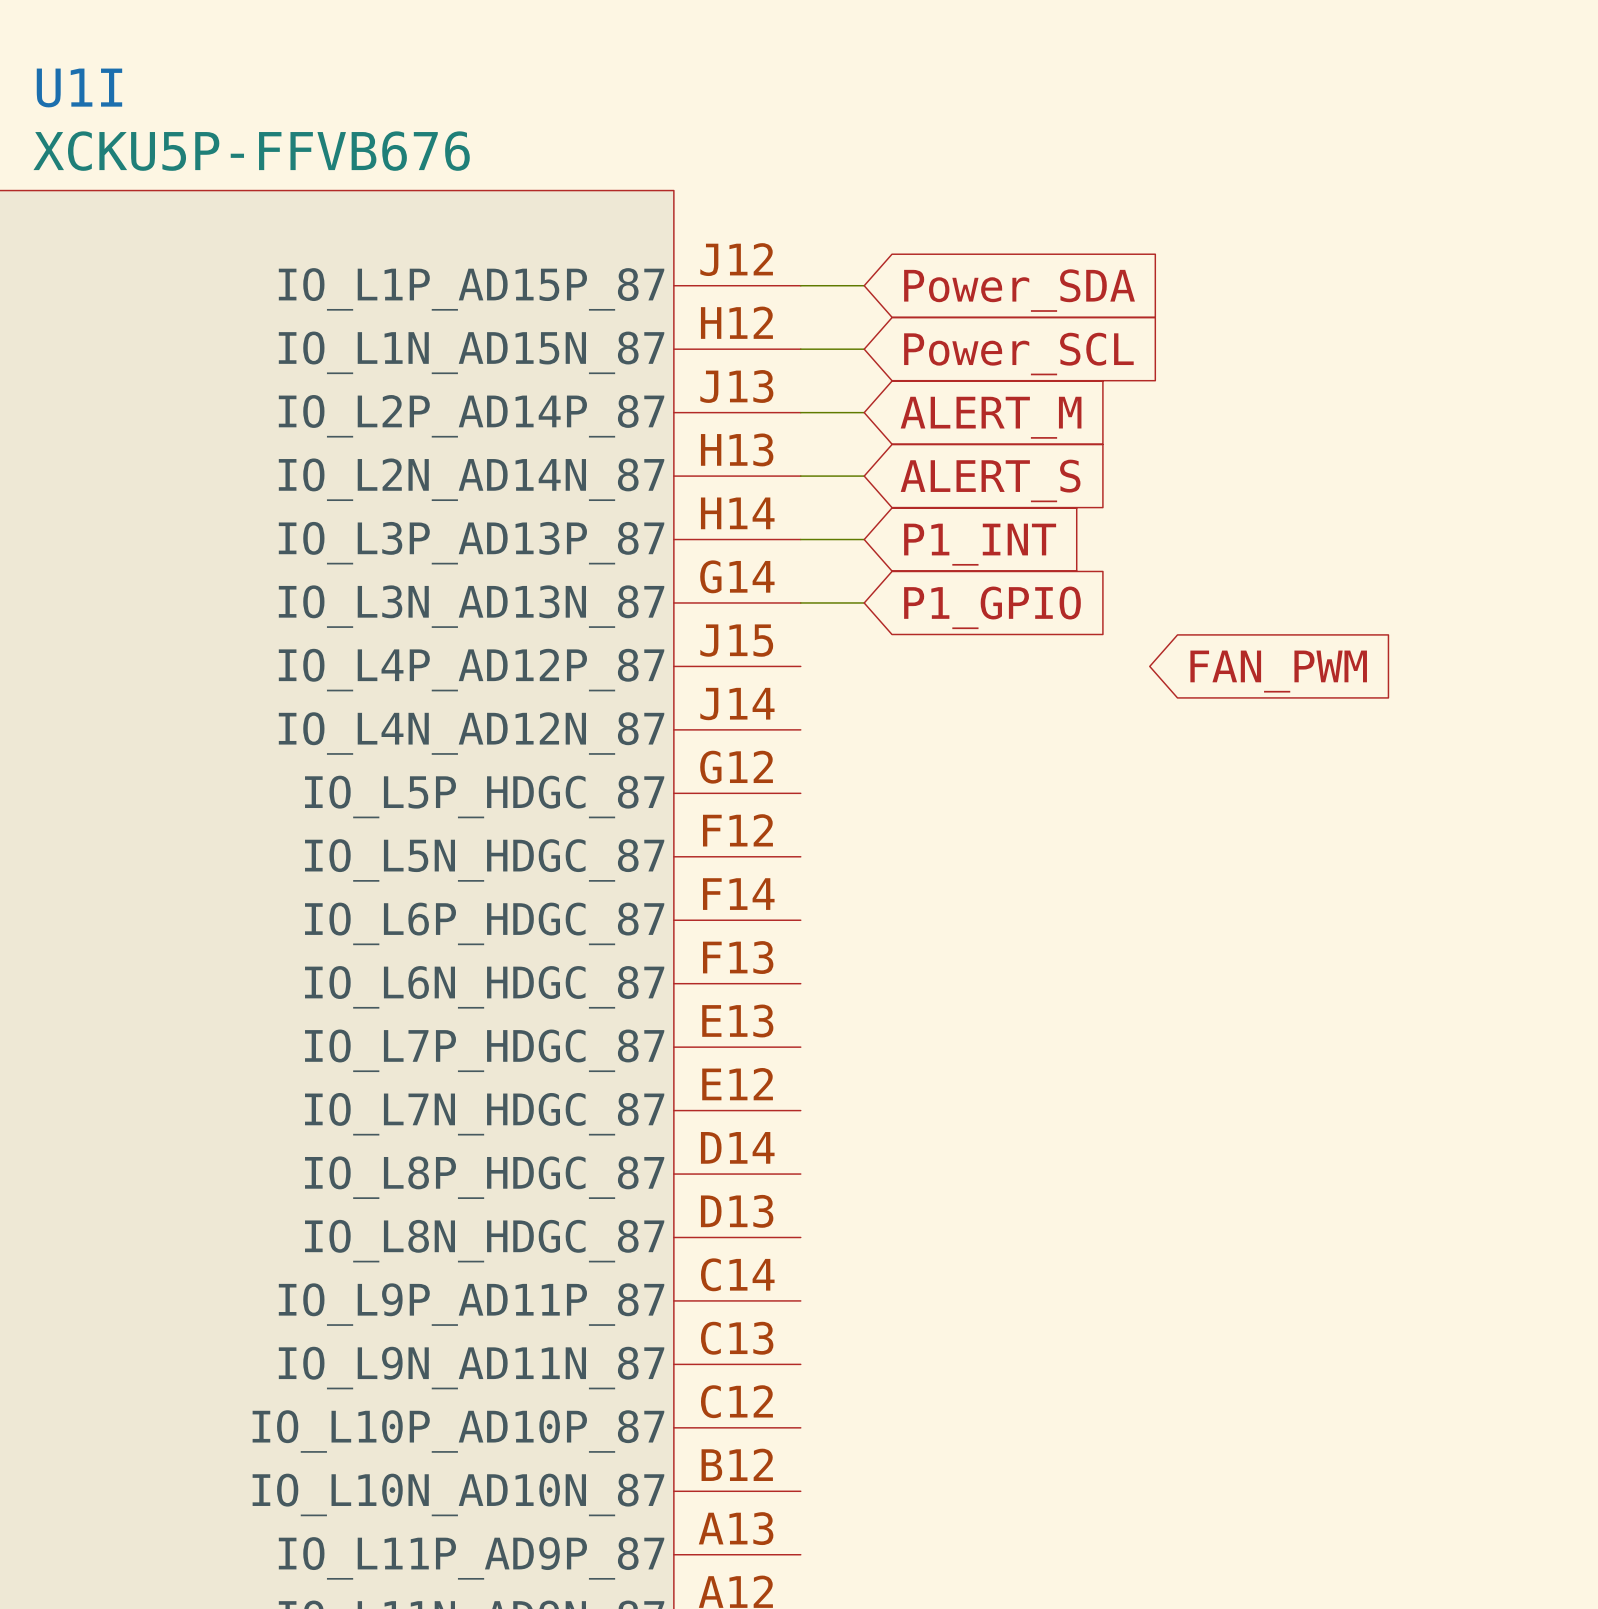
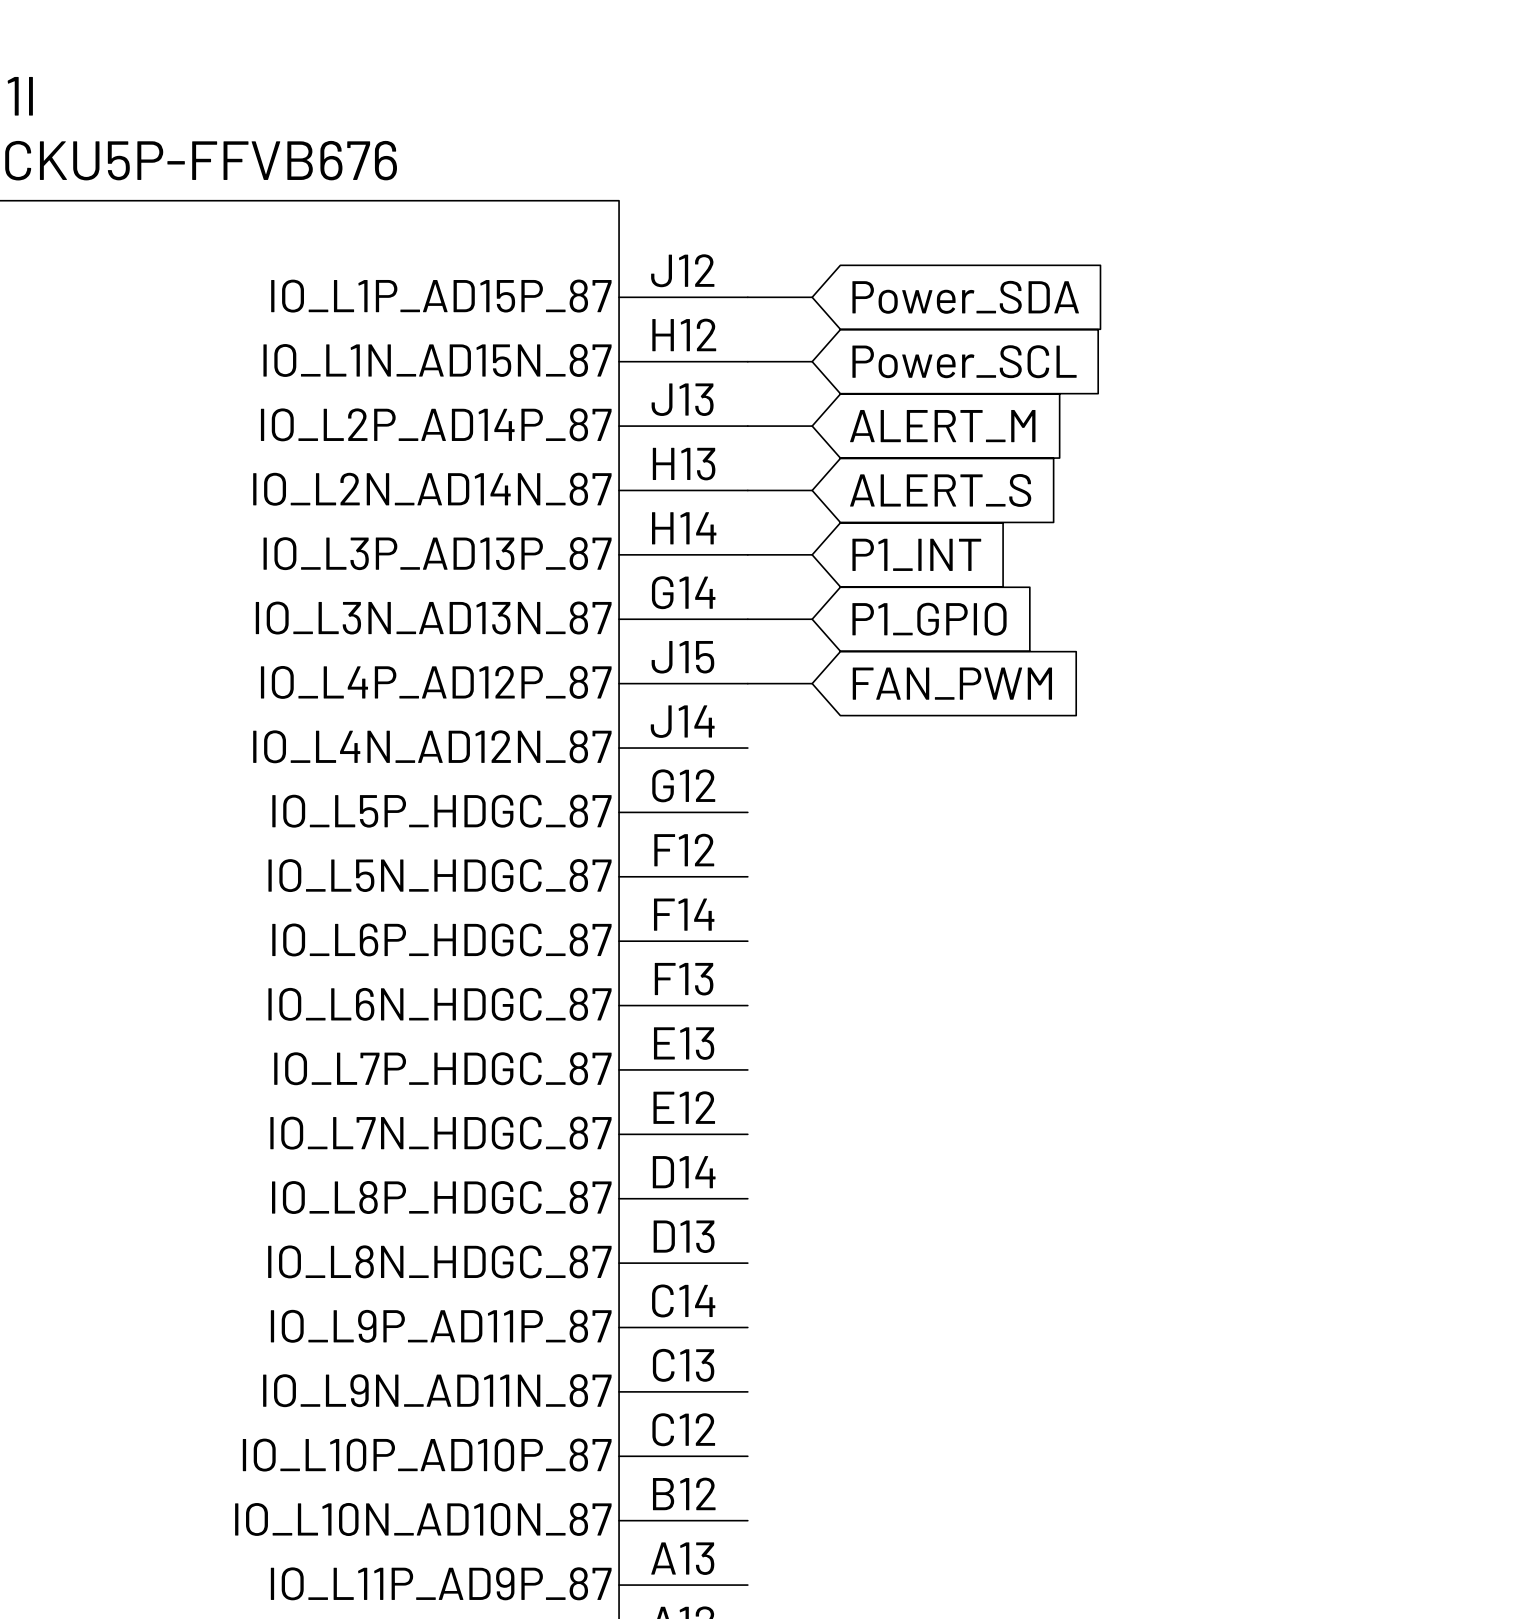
wire: none -> (747, 683) (812, 683)
global label position: FAN_PWM (1278, 671) -> FAN_PWM (952, 683)

